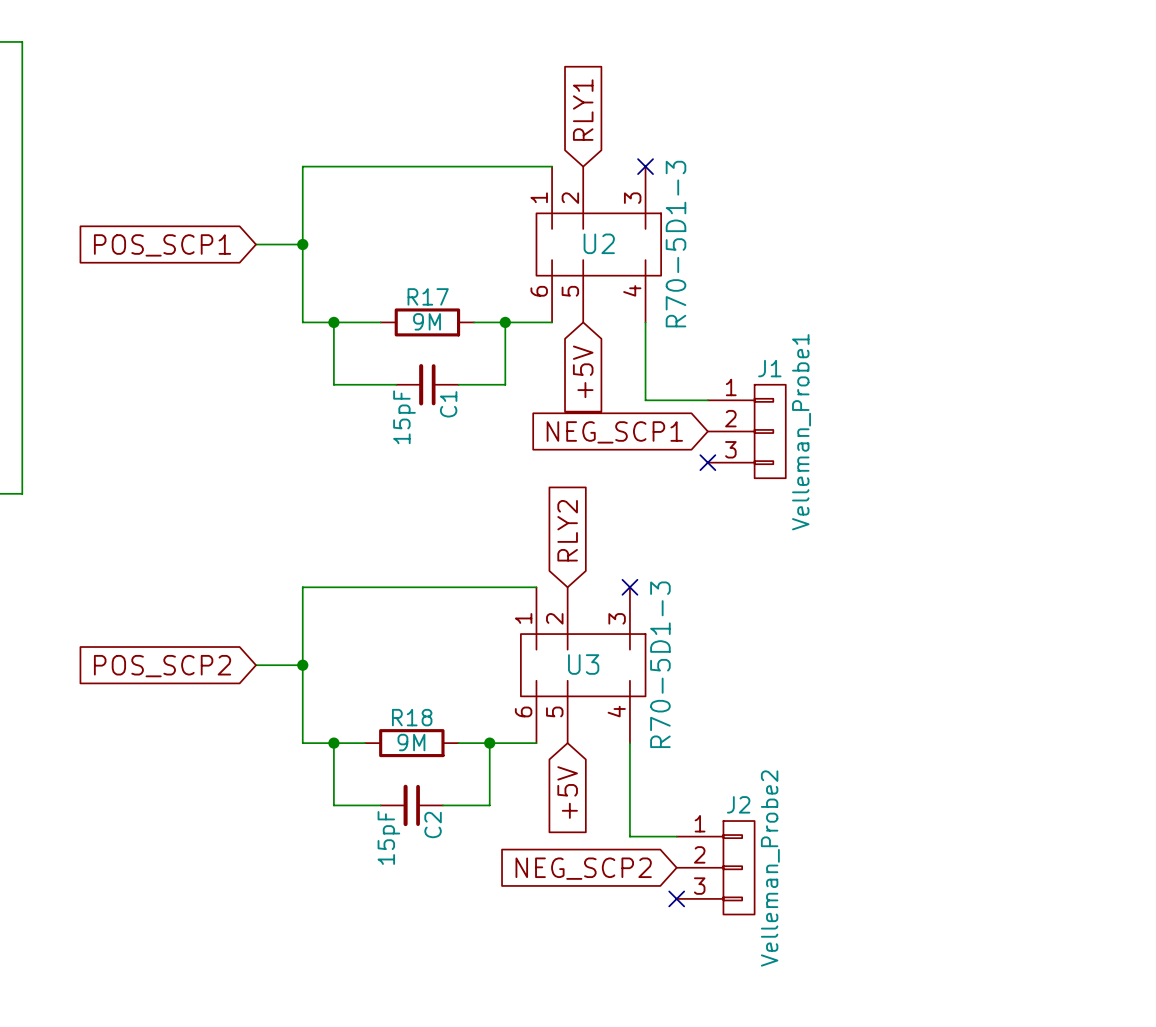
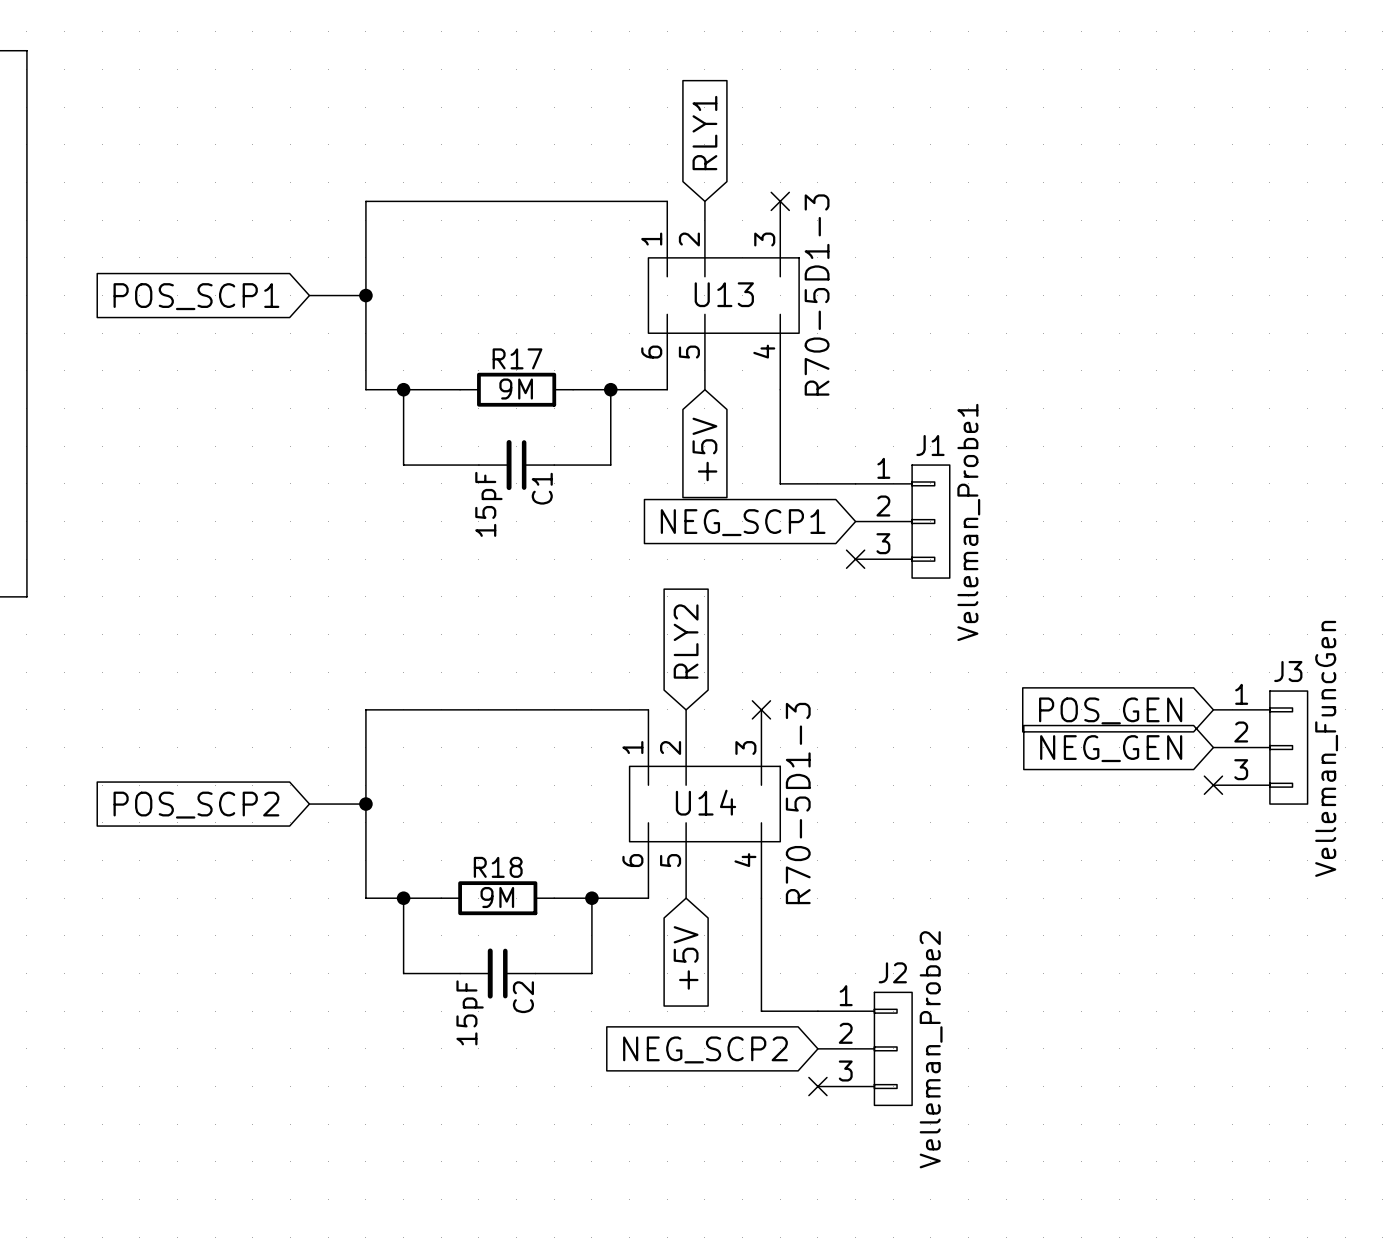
U2 name: U2 (599, 243) -> U13 (724, 294)
global label: none -> POS_GEN (1110, 710)
J3: none -> Velleman_FuncGen (1260, 747)
global label: none -> NEG_GEN (1111, 748)
no-connect mark: none -> (1213, 785)
U3 name: U3 (583, 664) -> U14 (706, 802)

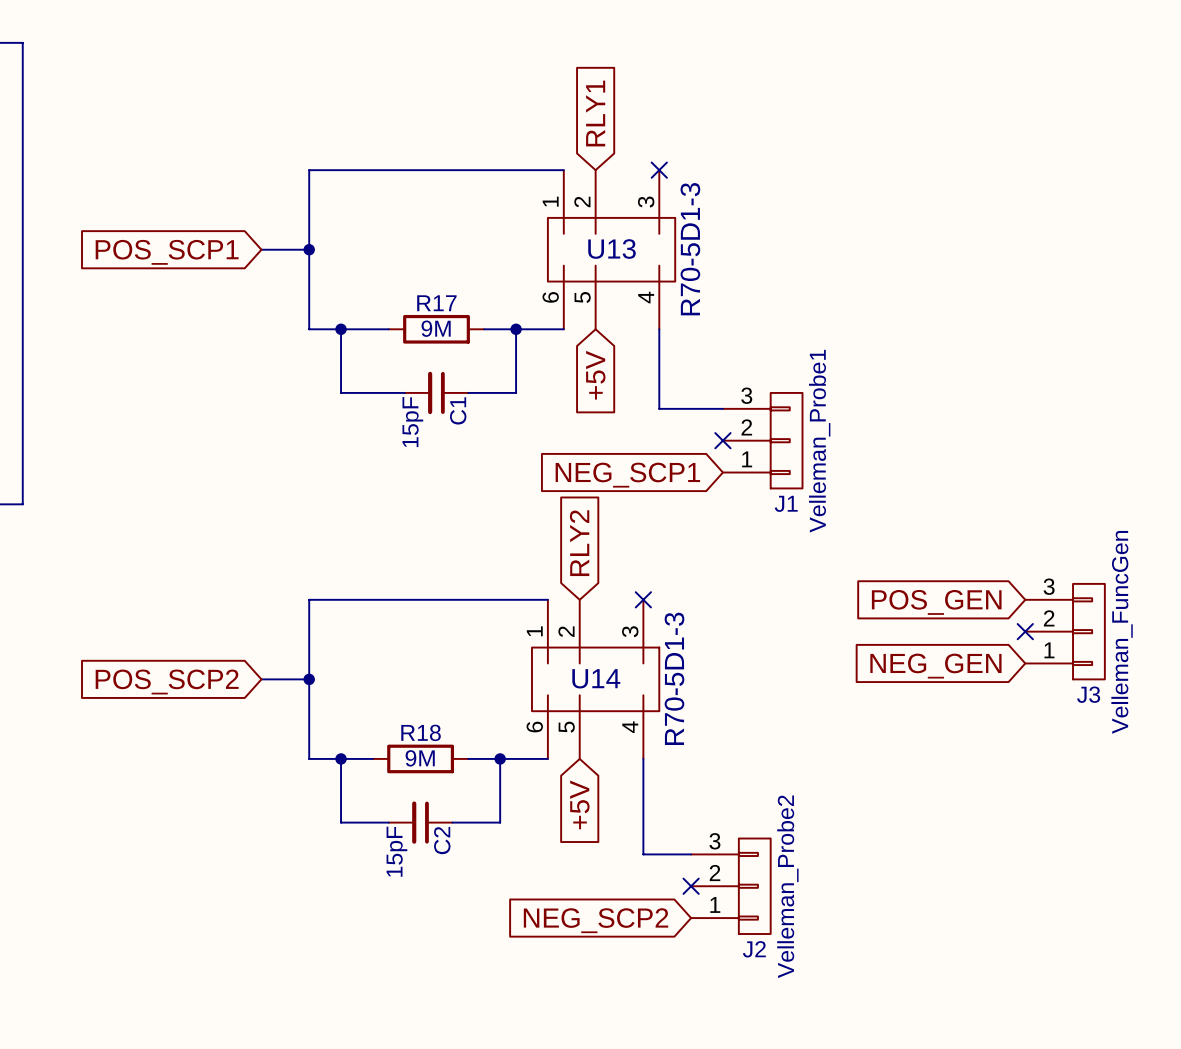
J1 flip: as is (930, 521) -> up-down (786, 440)
global label position: NEG_SCP1 (743, 522) -> NEG_SCP1 (627, 475)
no-connect mark position: (855, 559) -> (722, 440)
J3 flip: as is (1288, 747) -> up-down (1088, 631)
global label position: NEG_GEN (1111, 748) -> NEG_GEN (935, 666)
no-connect mark position: (1213, 785) -> (1025, 631)
J2 flip: as is (893, 1048) -> up-down (754, 886)
global label position: NEG_SCP2 (705, 1049) -> NEG_SCP2 (596, 920)
no-connect mark position: (817, 1086) -> (691, 886)

